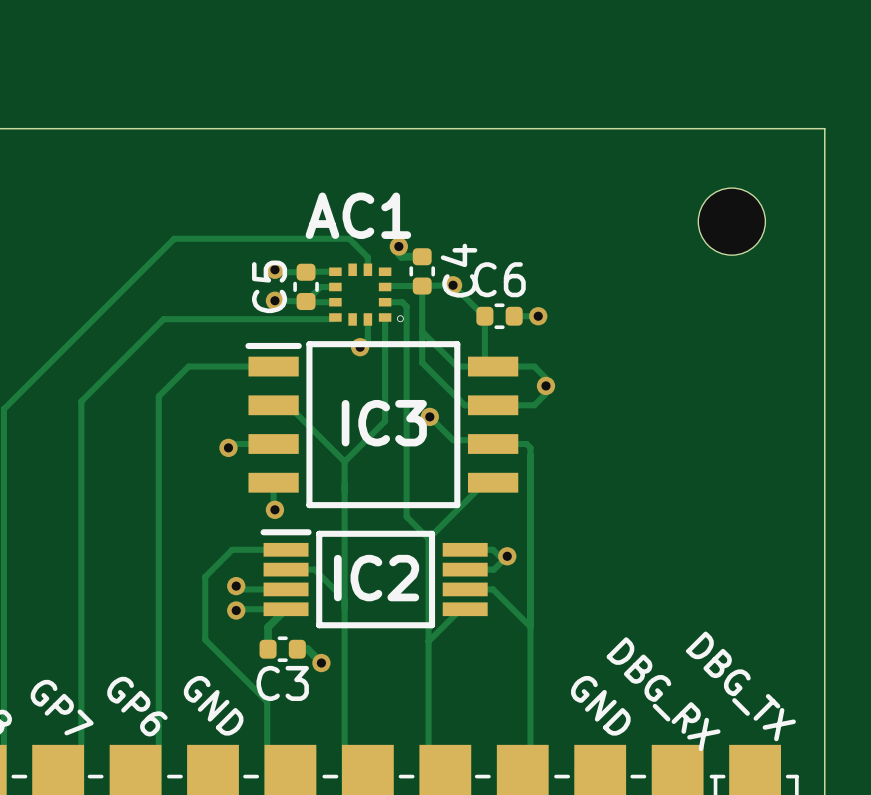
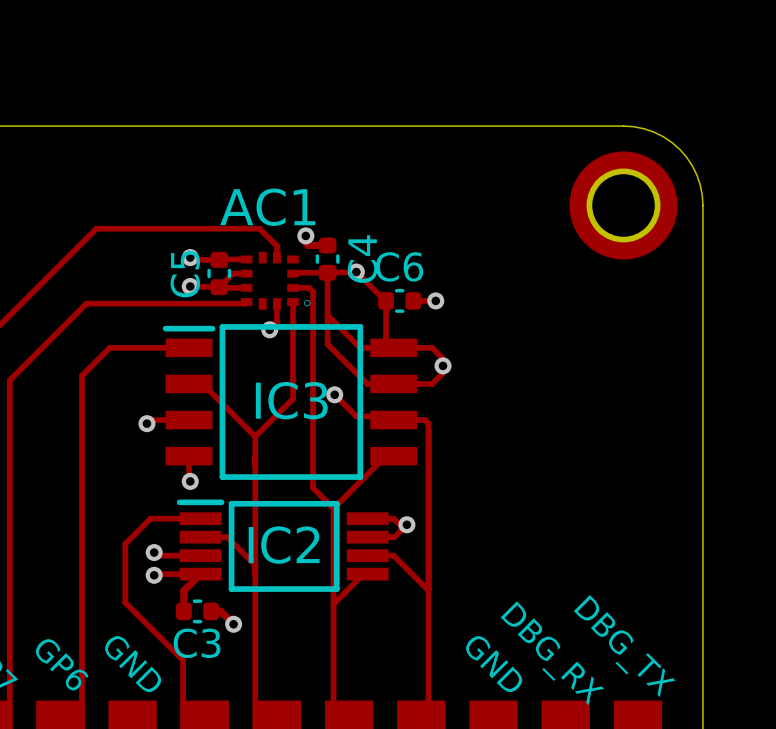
board edge: (739, 128) (824, 128) (824, 213) -> (623, 126) (653, 132) (679, 149) (696, 175) (702, 205)
part footprint: [698, 188, 766, 256] -> [569, 151, 678, 260]

